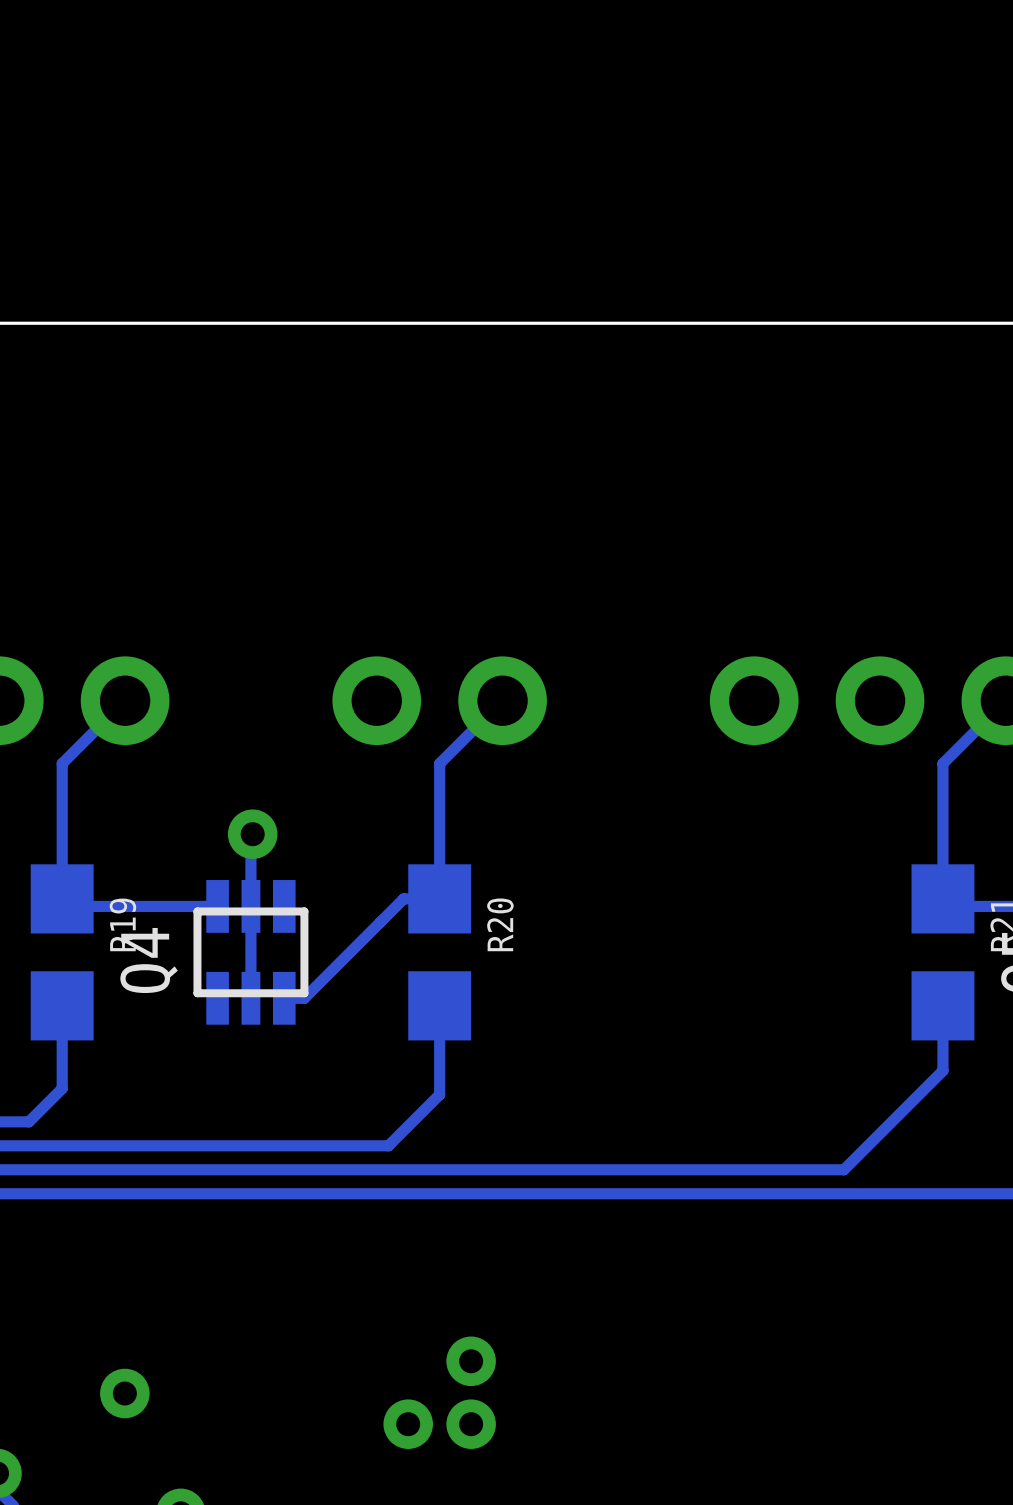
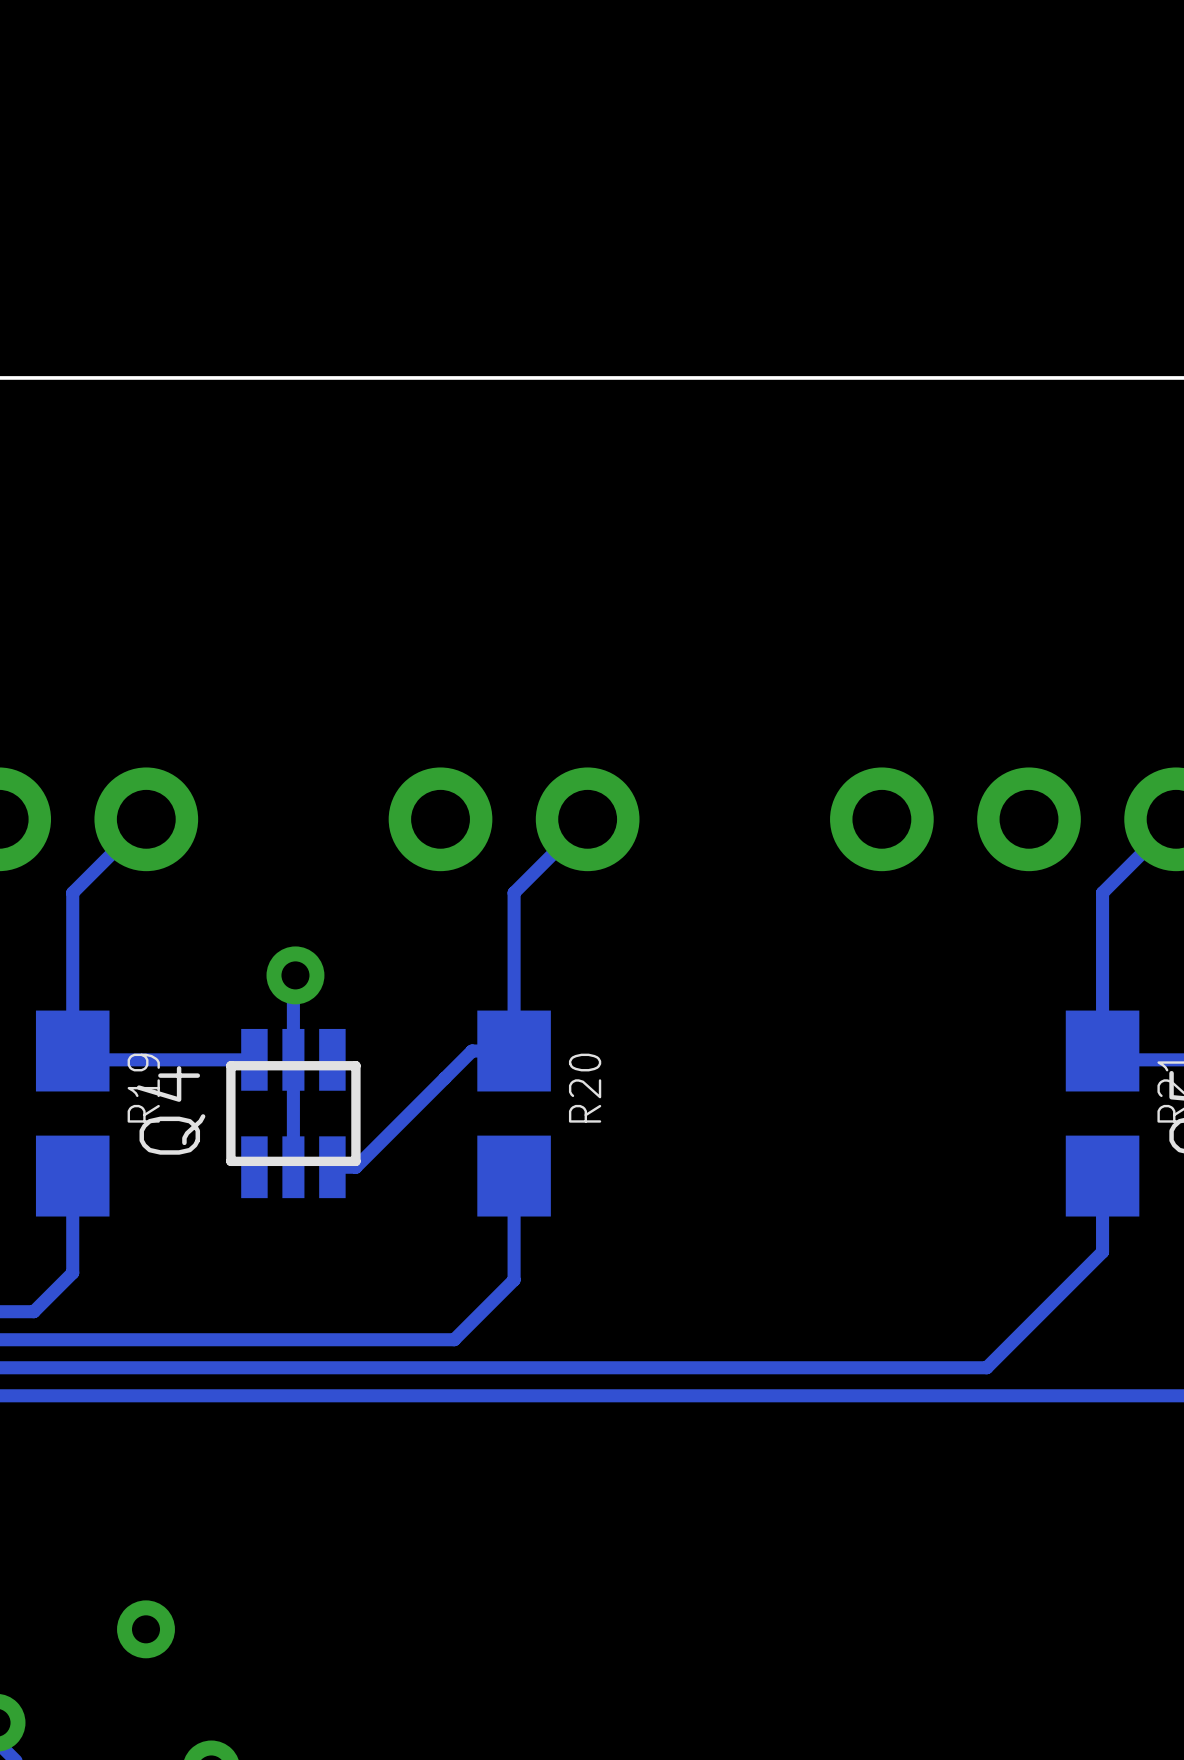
via: (471, 1361) -> none
via: (408, 1424) -> none
via: (471, 1424) -> none

